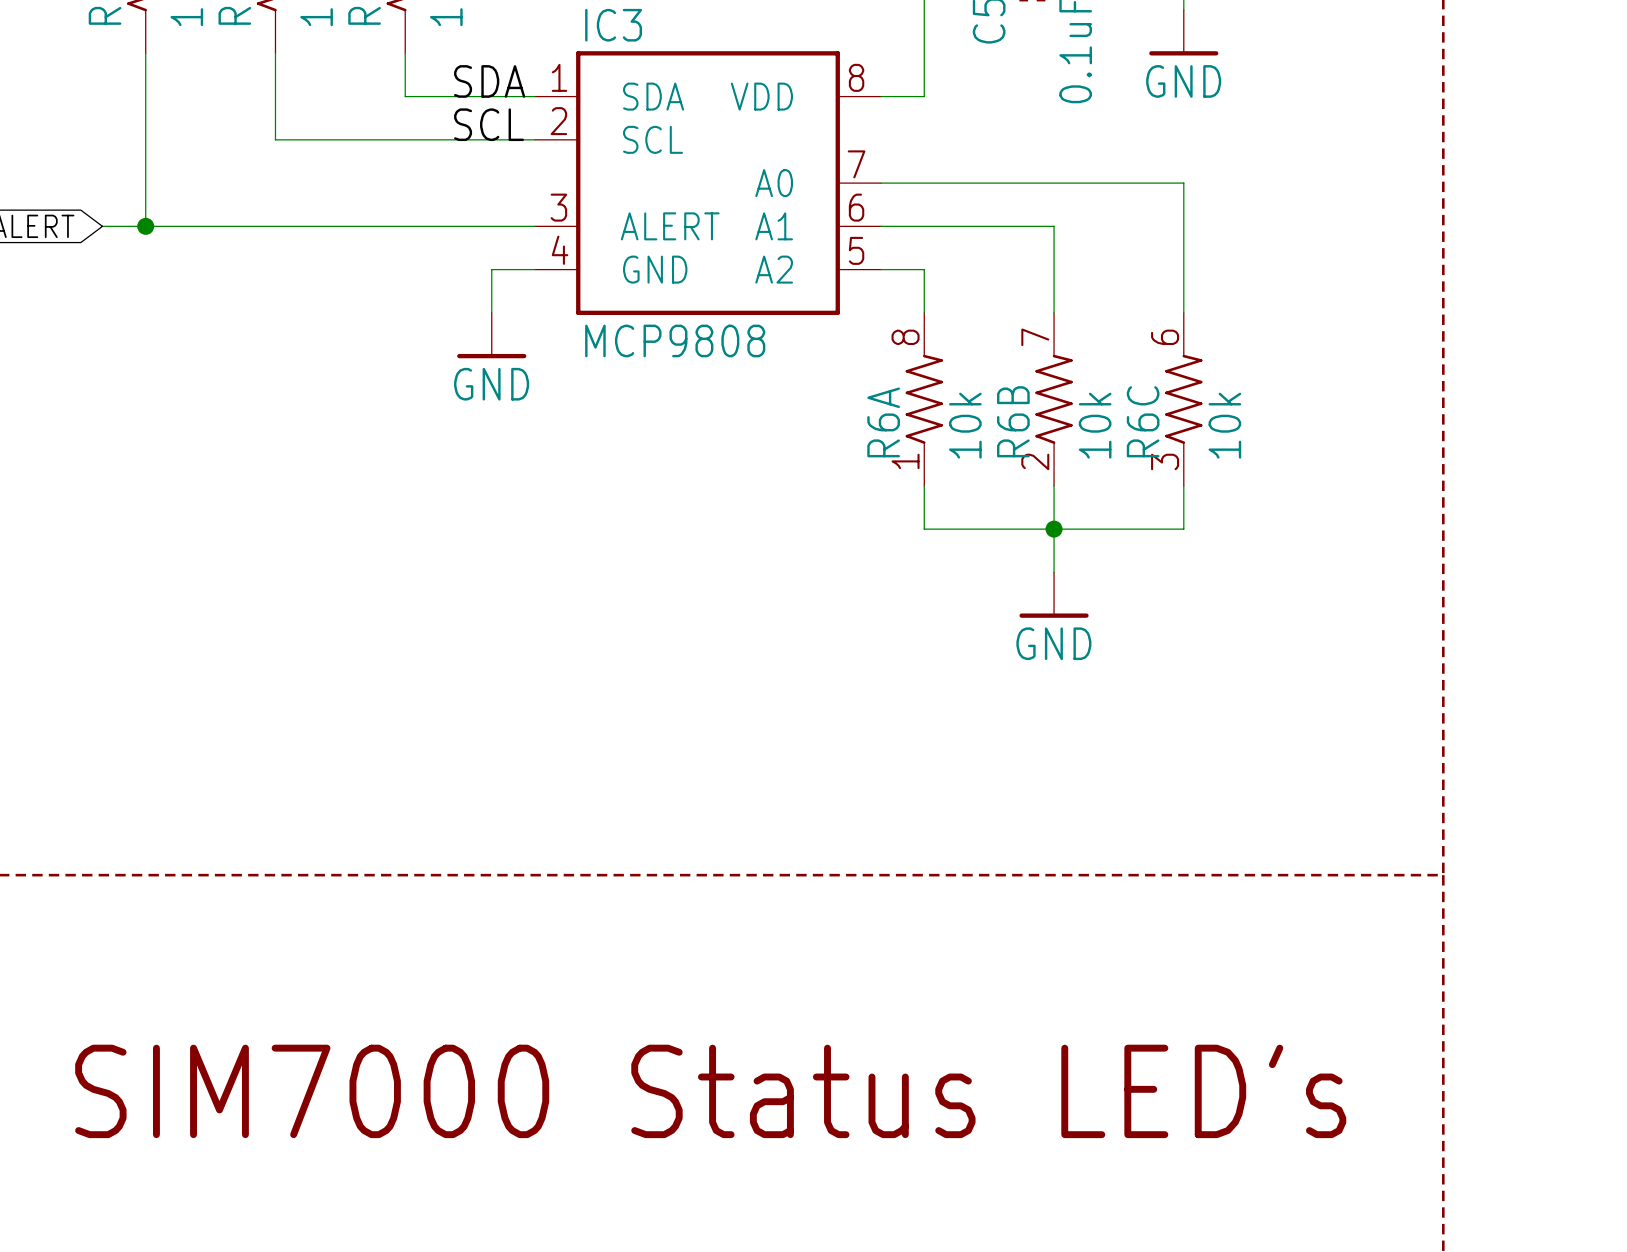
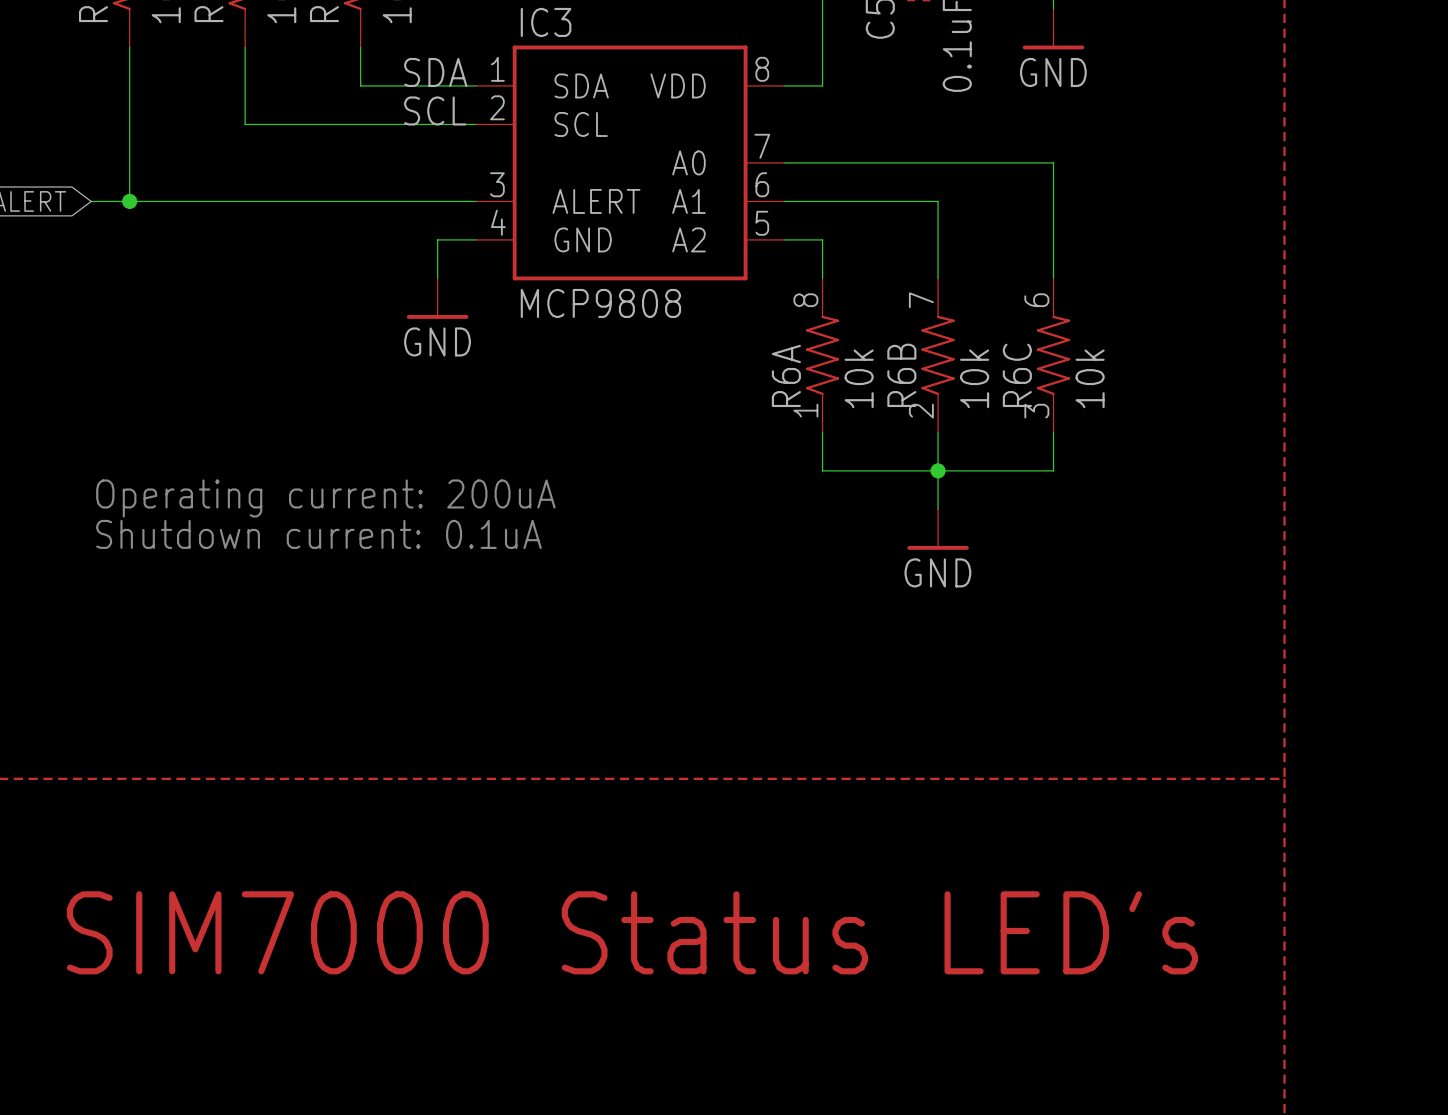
text: none -> Operating current: 200uA (325, 498)
text: none -> Shutdown current: 0.1uA (318, 534)
text position: SIM7000 Status LED's (710, 1091) -> SIM7000 Status LED's (632, 932)

